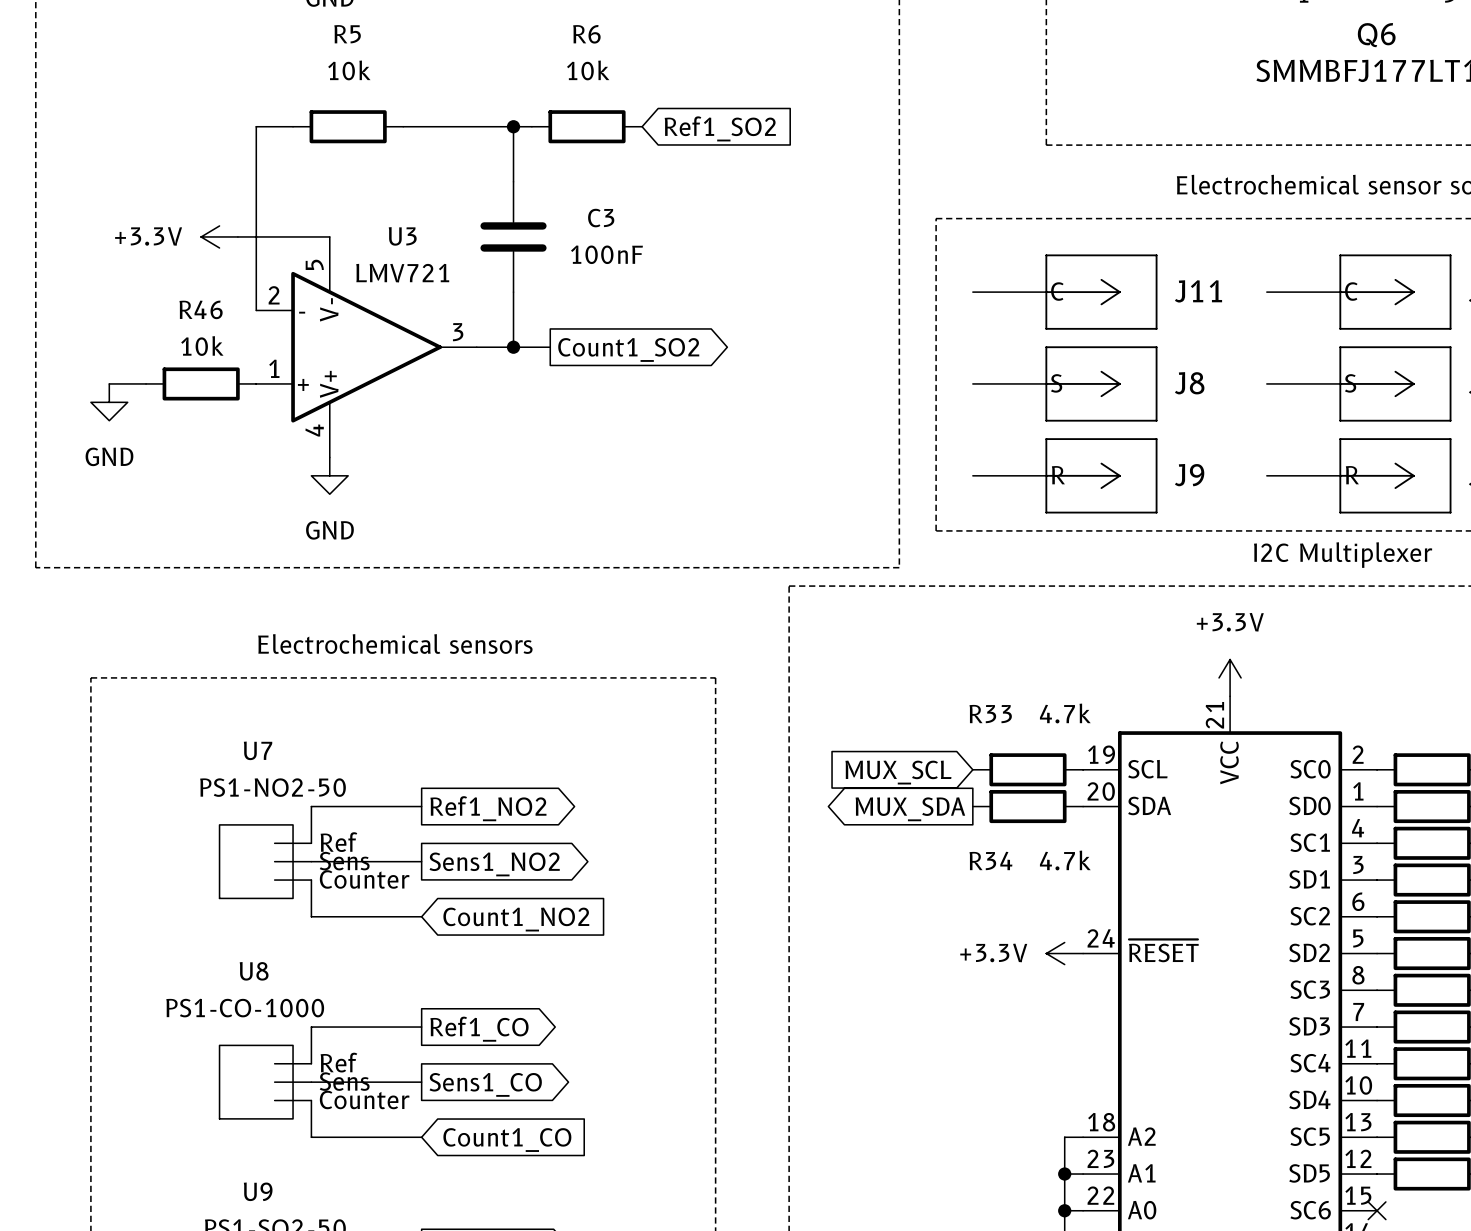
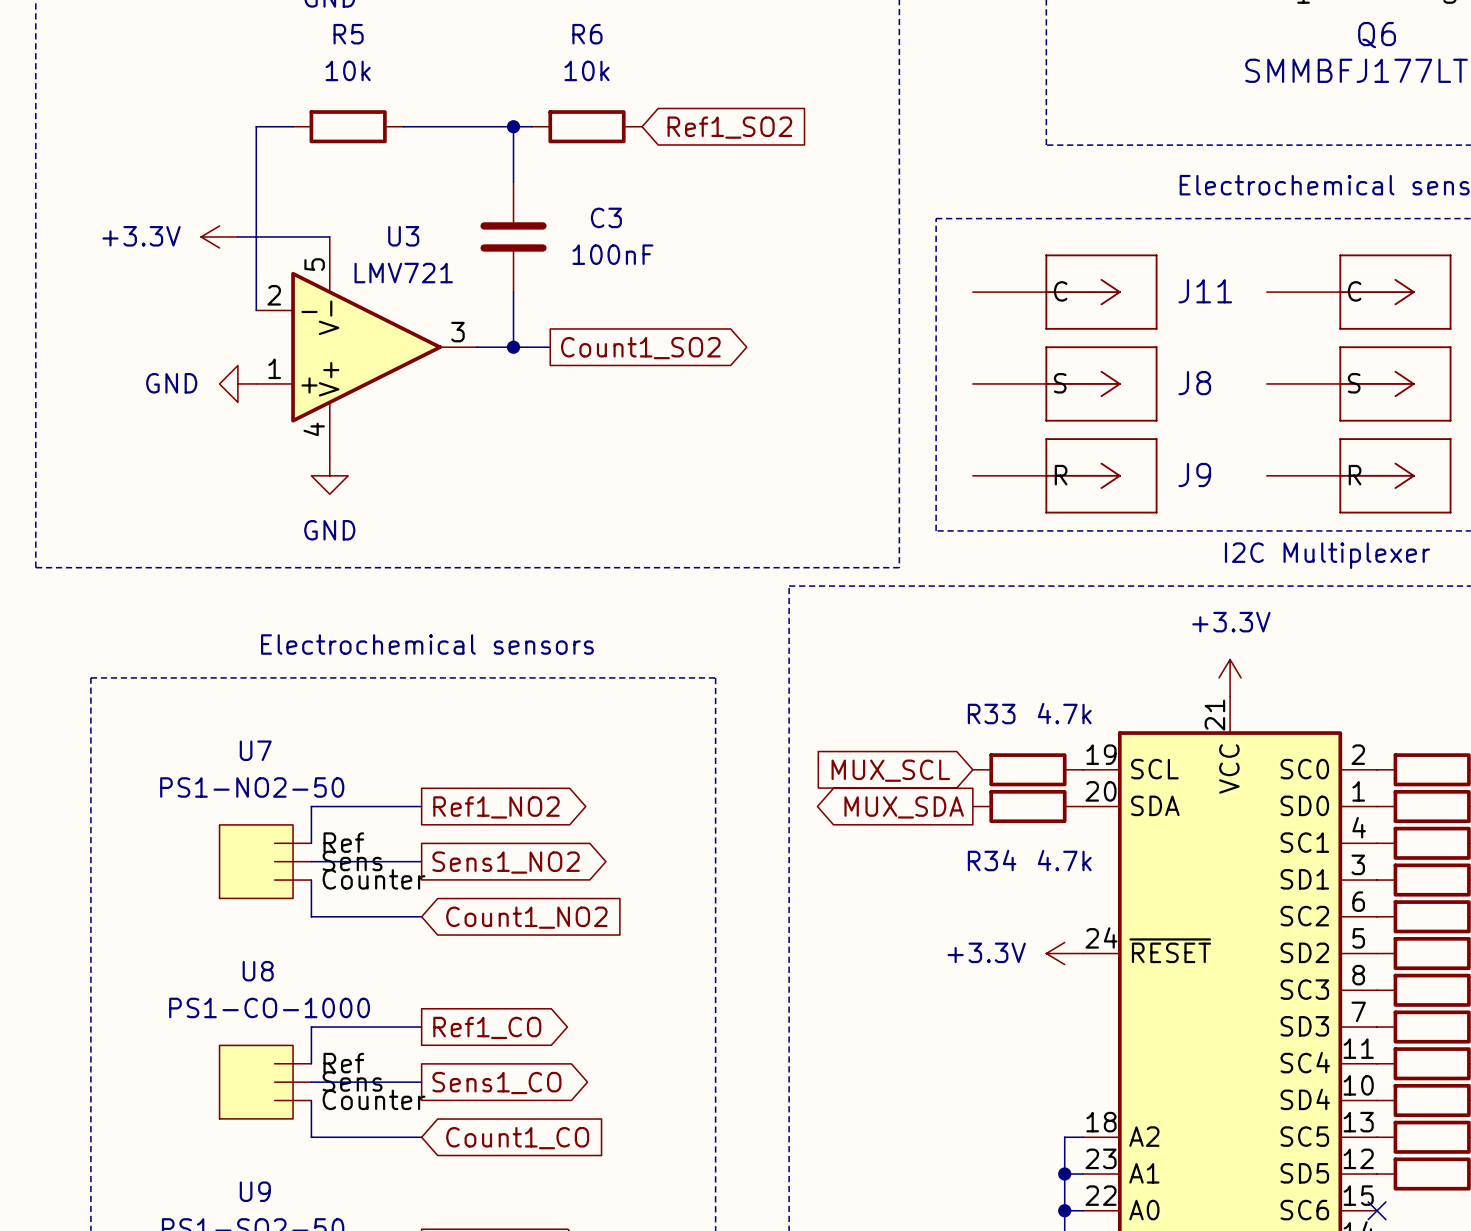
wire: (109, 383) (146, 383) -> none
R46: 10k (201, 383) -> none
power symbol rotation: 0° (109, 402) -> 90° clockwise (237, 383)
power symbol position: GND (109, 402) -> GND (237, 383)

